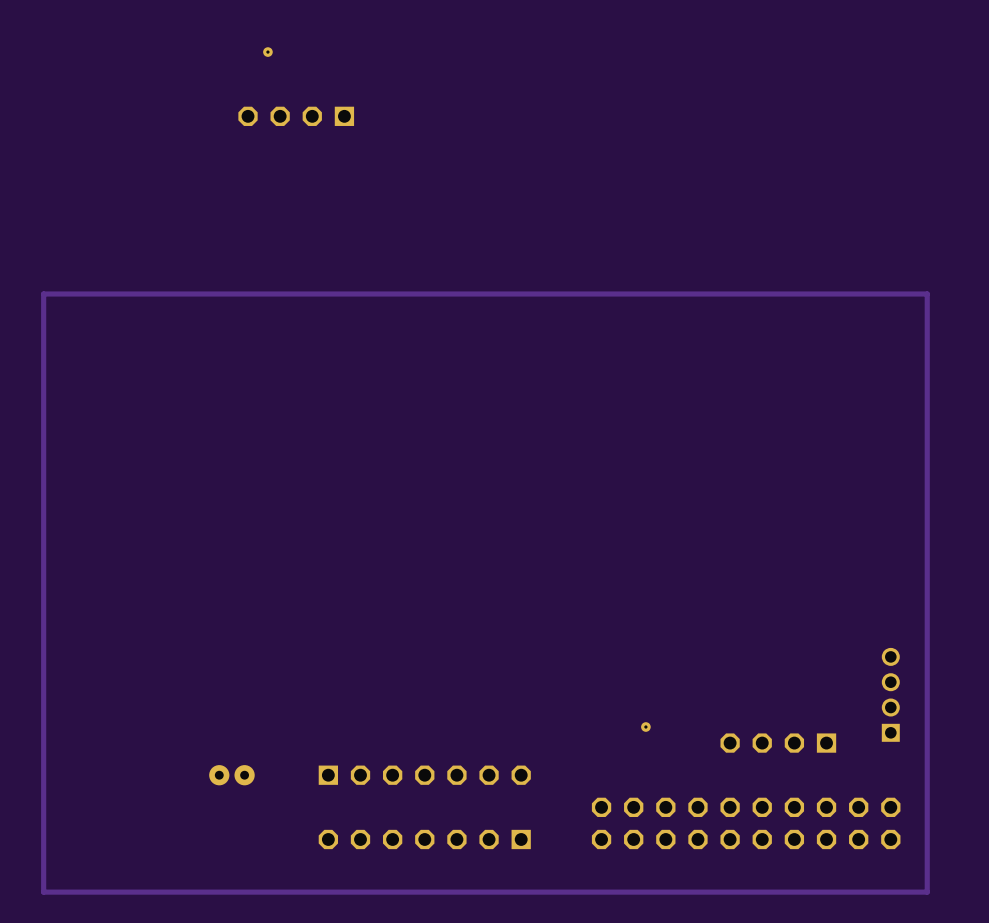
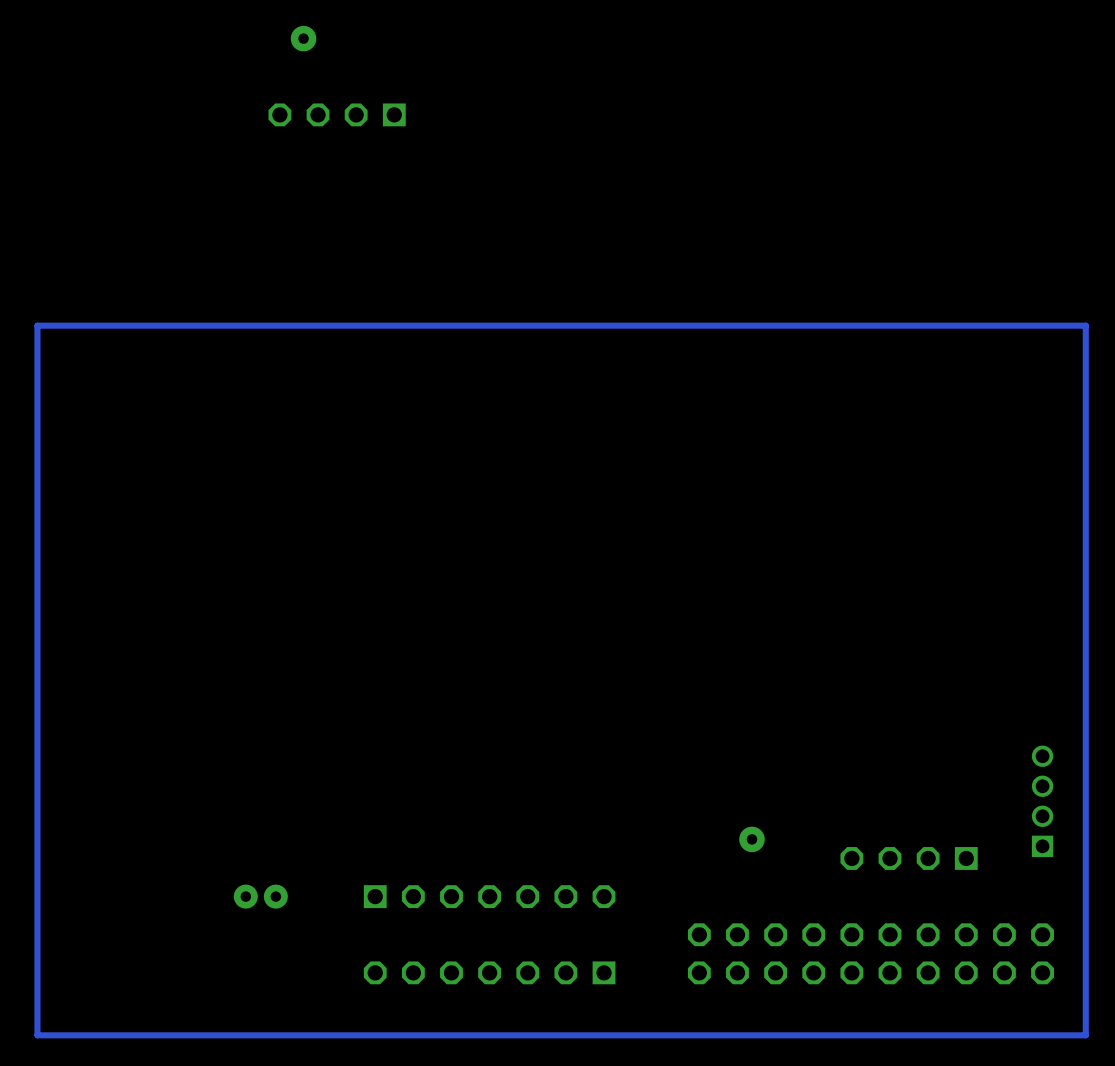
part footprint: [263, 47, 273, 57] -> [290, 25, 317, 52]
part footprint: [641, 722, 651, 732] -> [739, 826, 765, 853]

